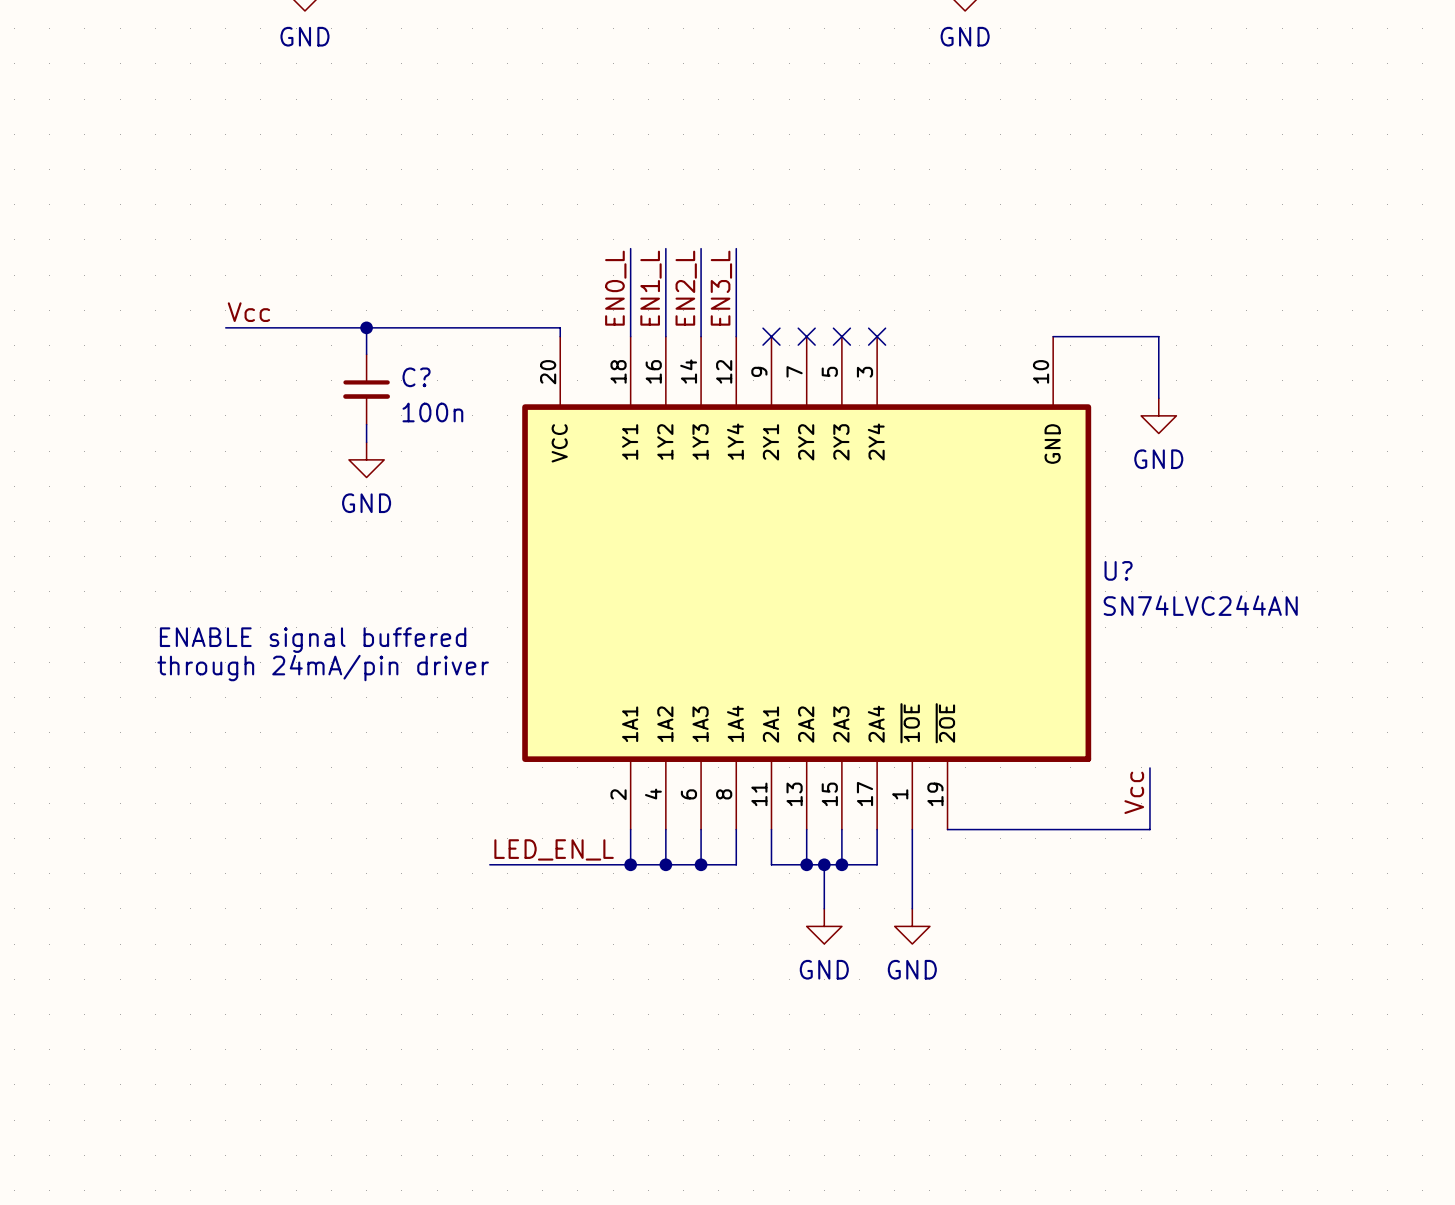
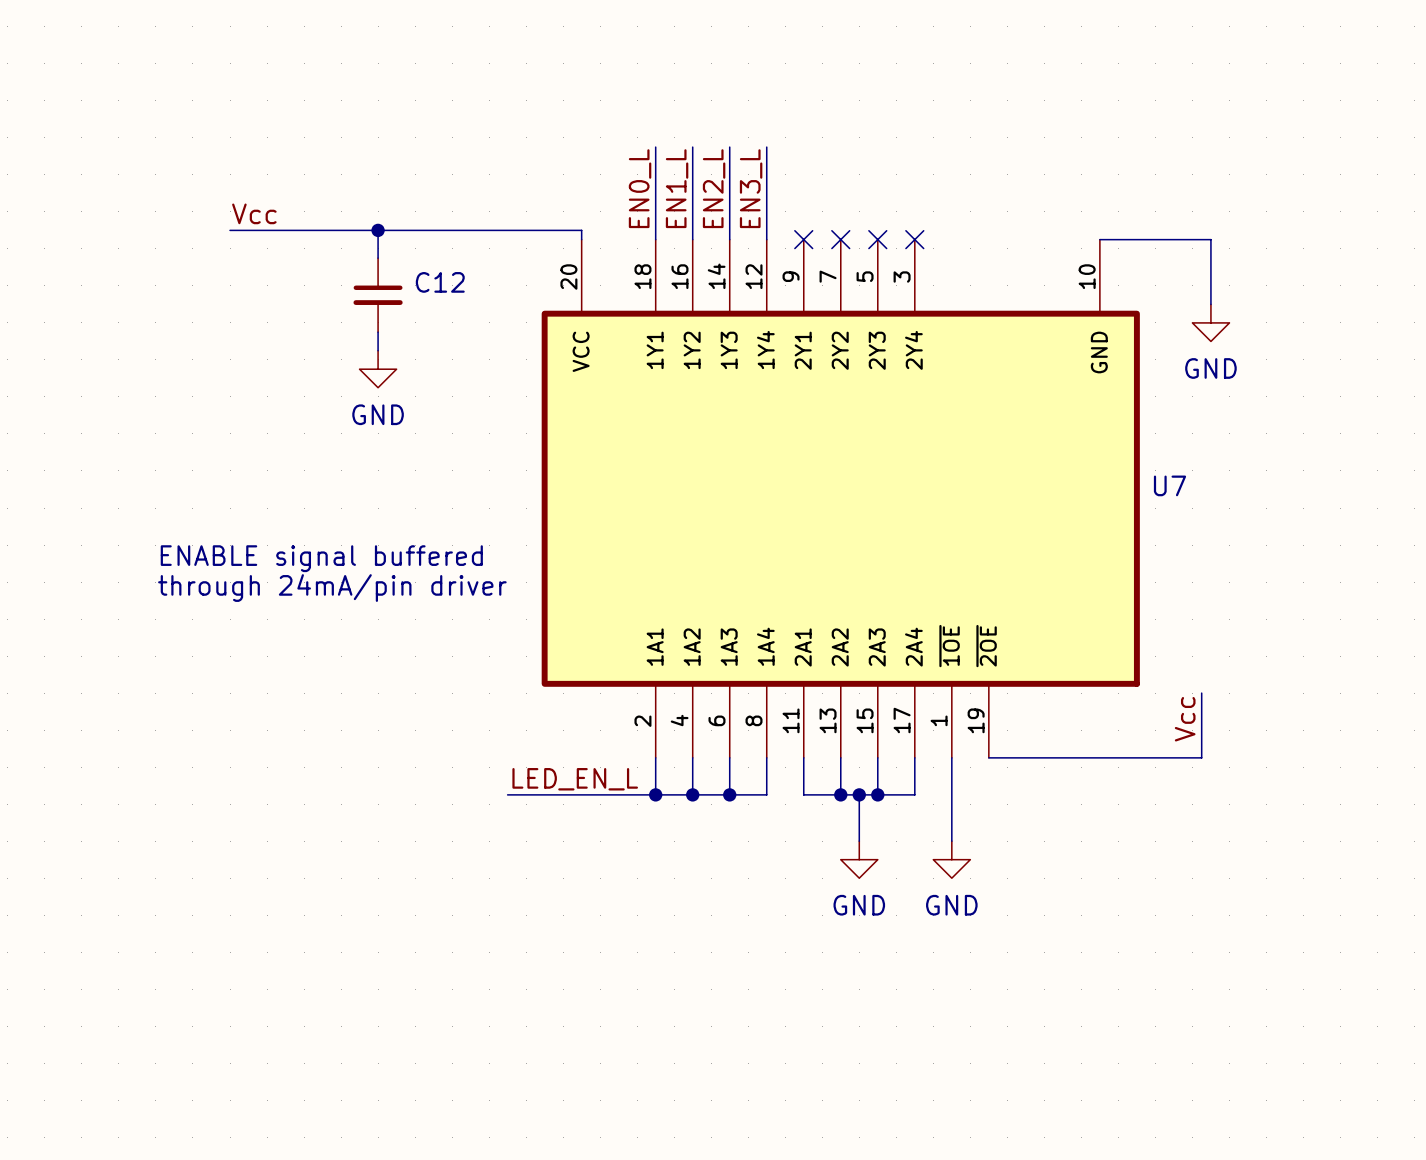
C? name: C? (416, 377) -> C12 (440, 282)
C? value: 100n (432, 412) -> none
U? name: U? (1118, 570) -> U7 (1169, 485)
U? value: SN74LVC244AN (1200, 605) -> none

